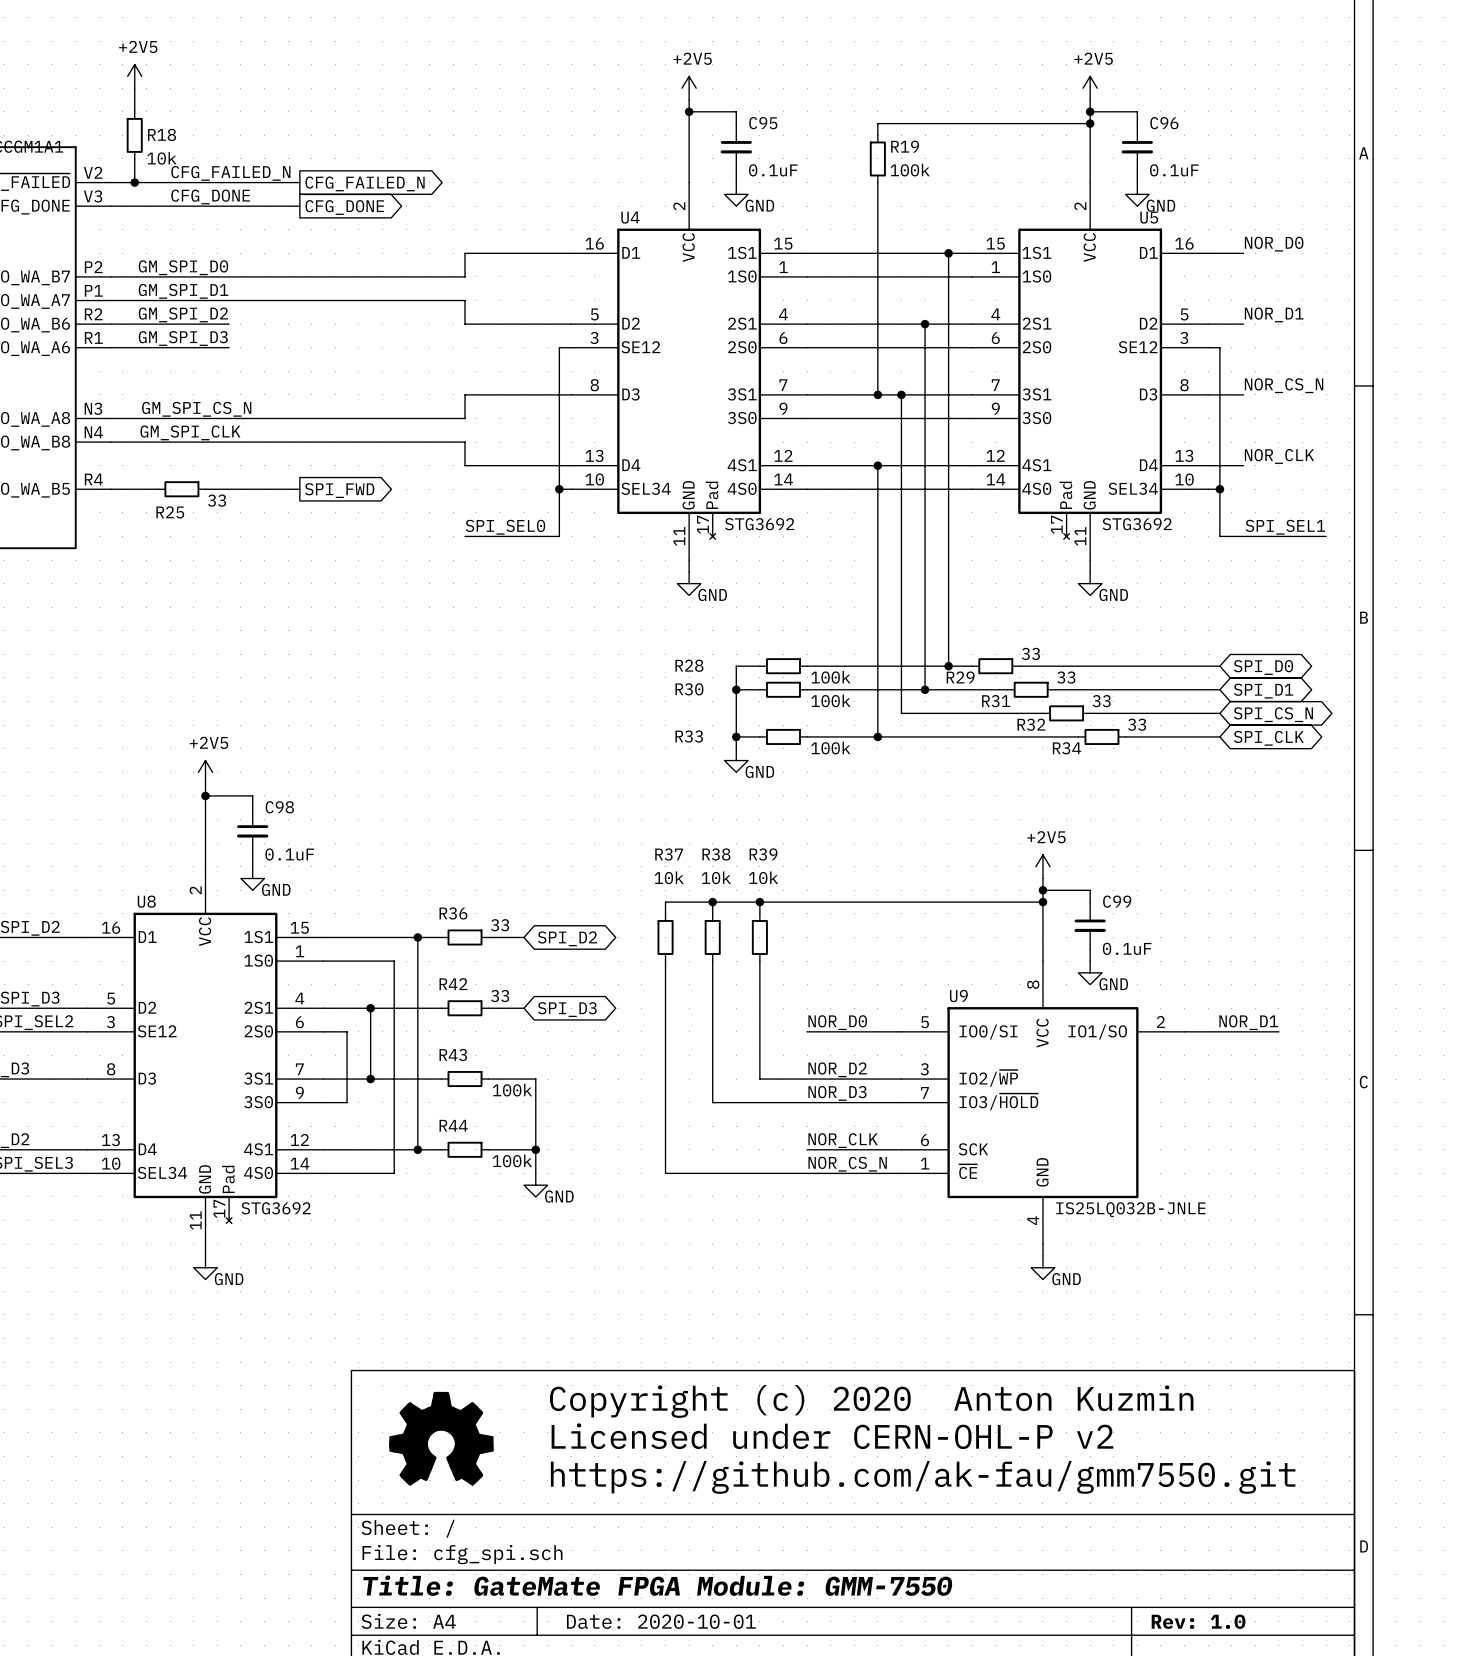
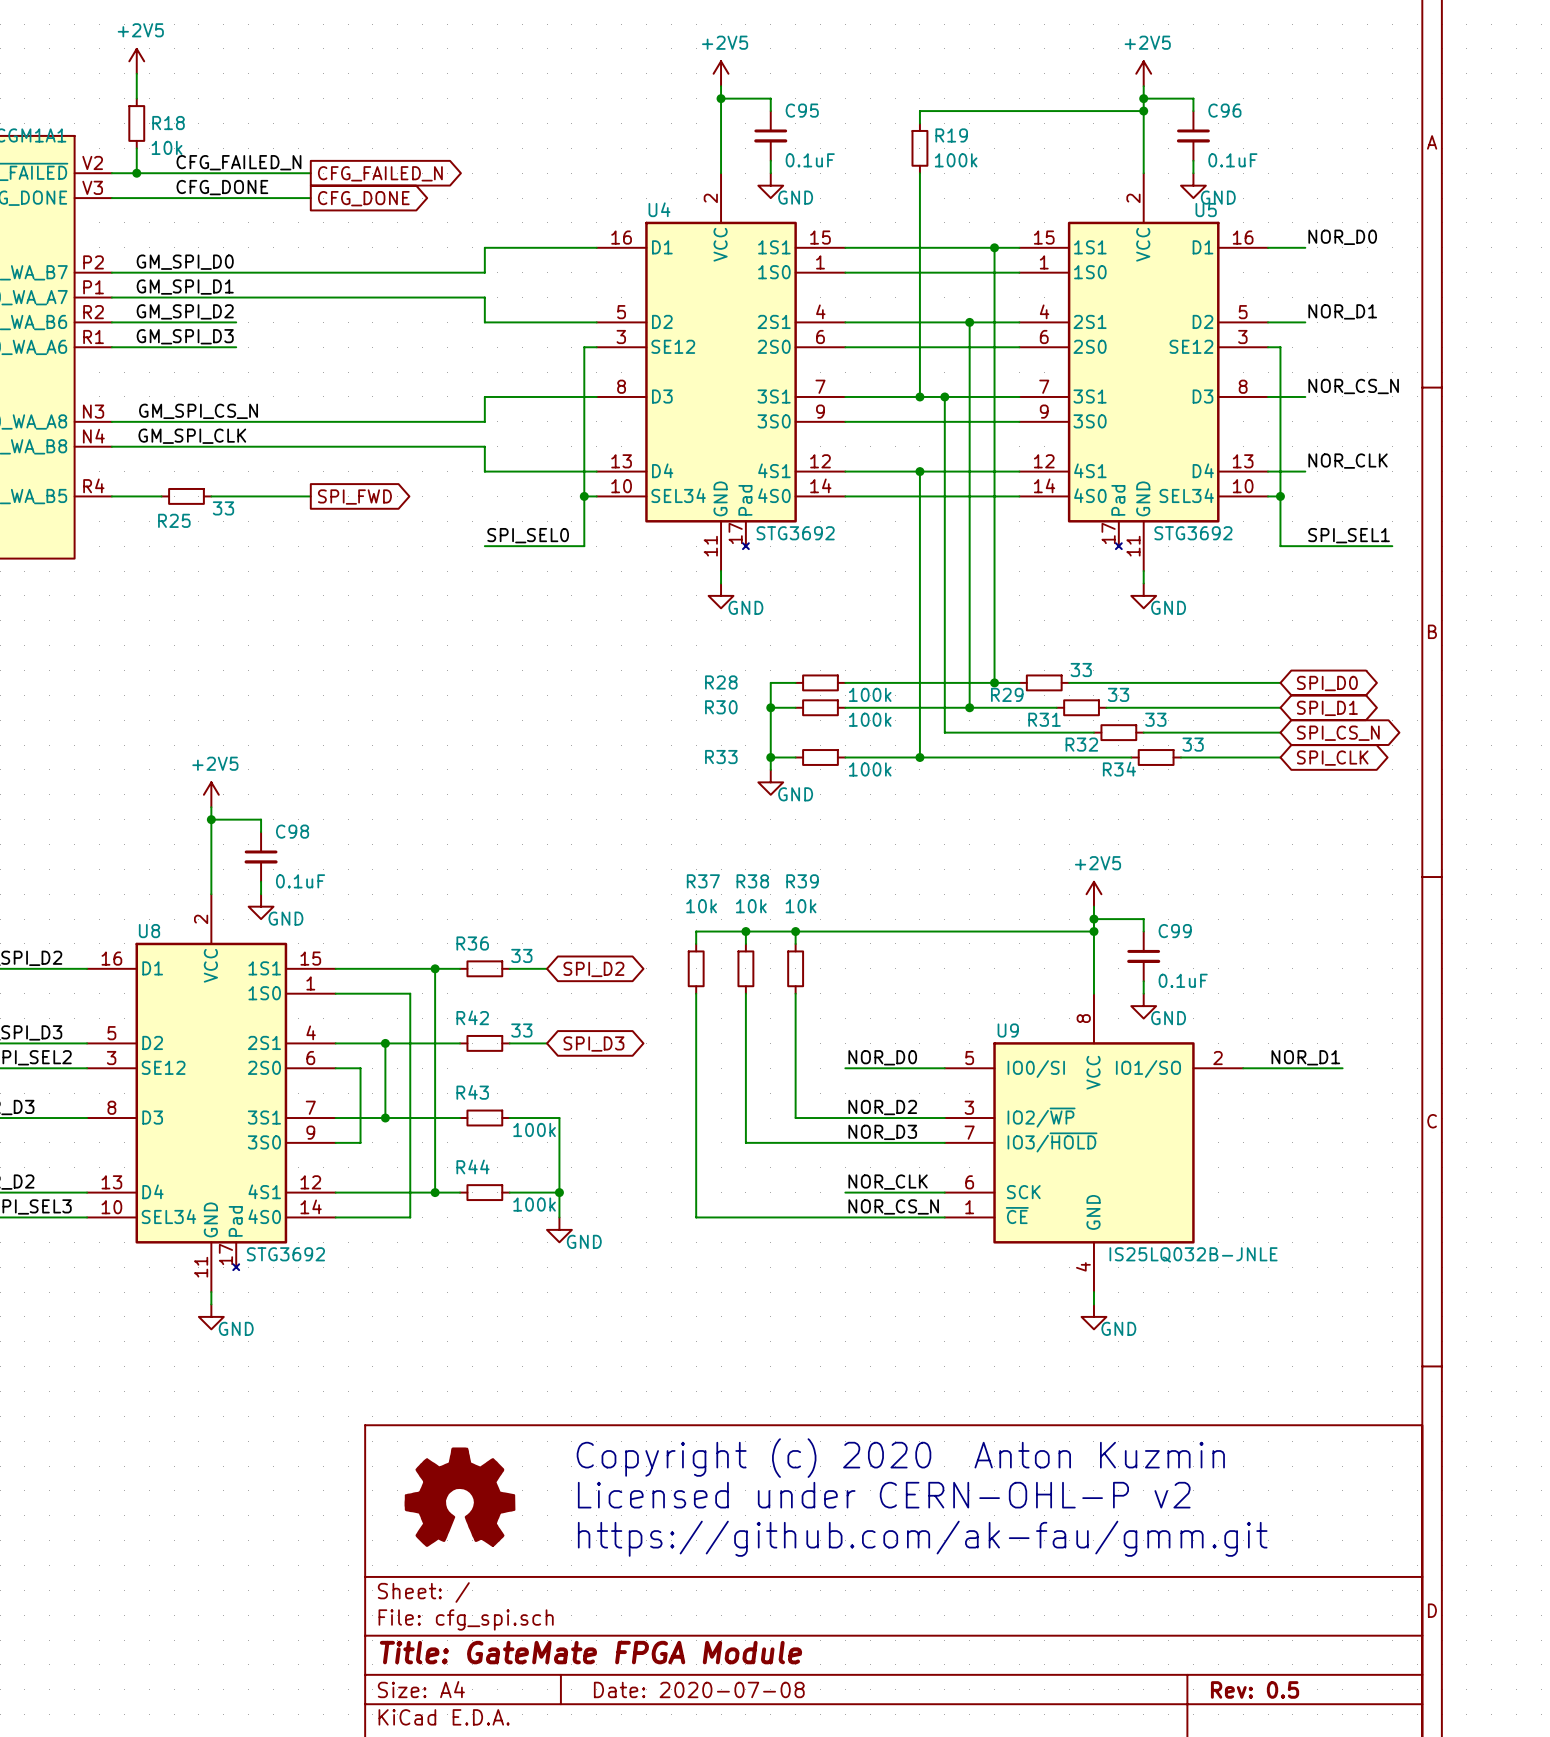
text: https://github.com/ak-fau/gmm7550.git (923, 1477) -> https://github.com/ak-fau/gmm.git (922, 1538)
title block: Title: GateMate FPGA Module: GMM-7550 (657, 1585) -> Title: GateMate FPGA Module (591, 1652)
title block: Date: 2020-10-01 (661, 1621) -> Date: 2020-07-08 (699, 1689)
title block: Rev: 1.0 (1198, 1621) -> Rev: 0.5 (1255, 1689)

